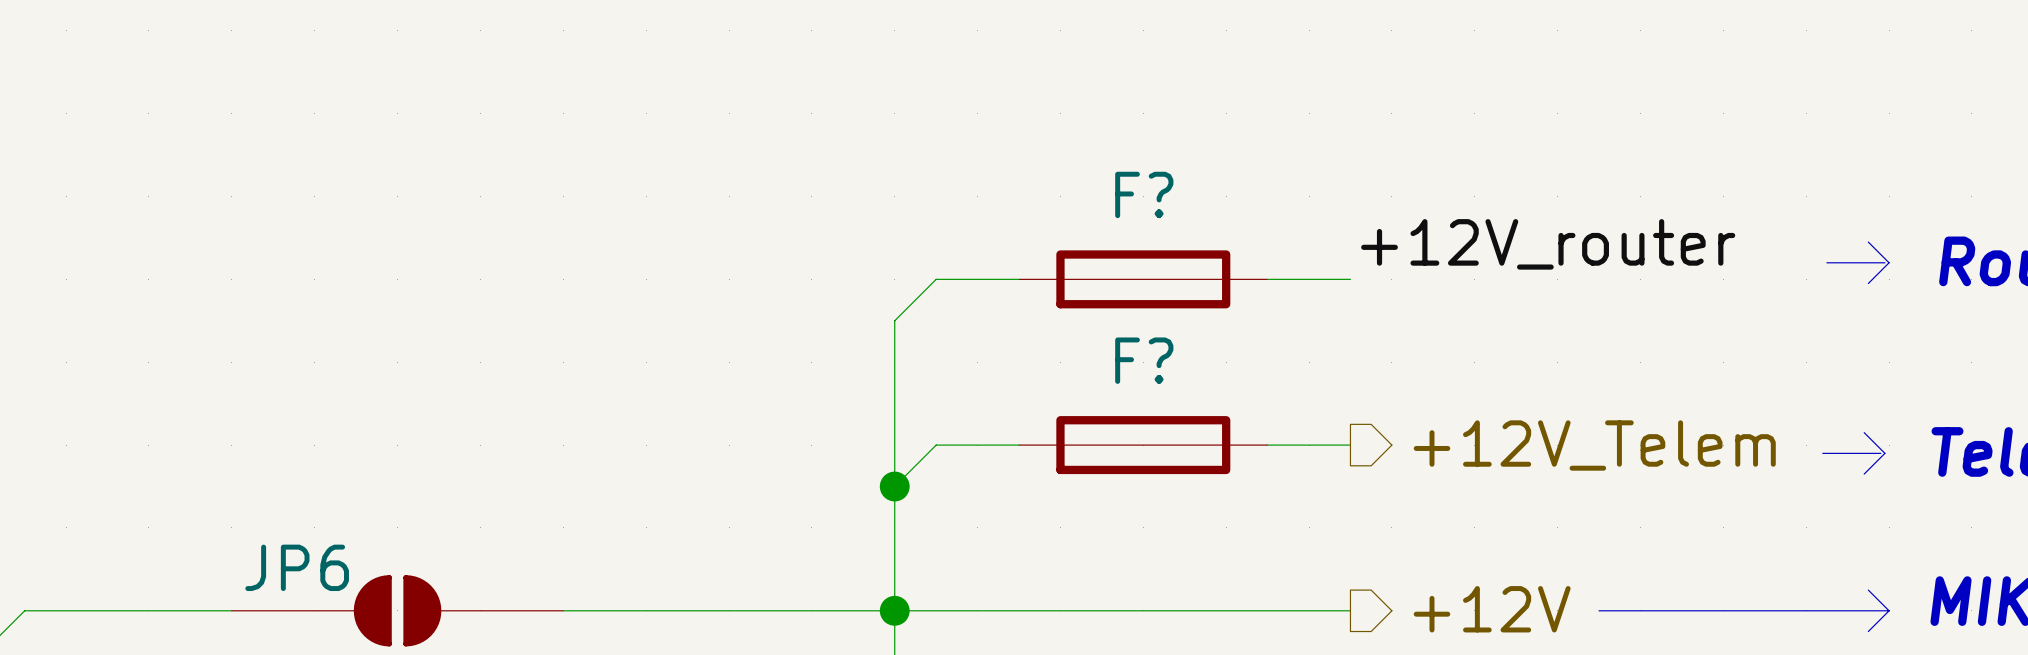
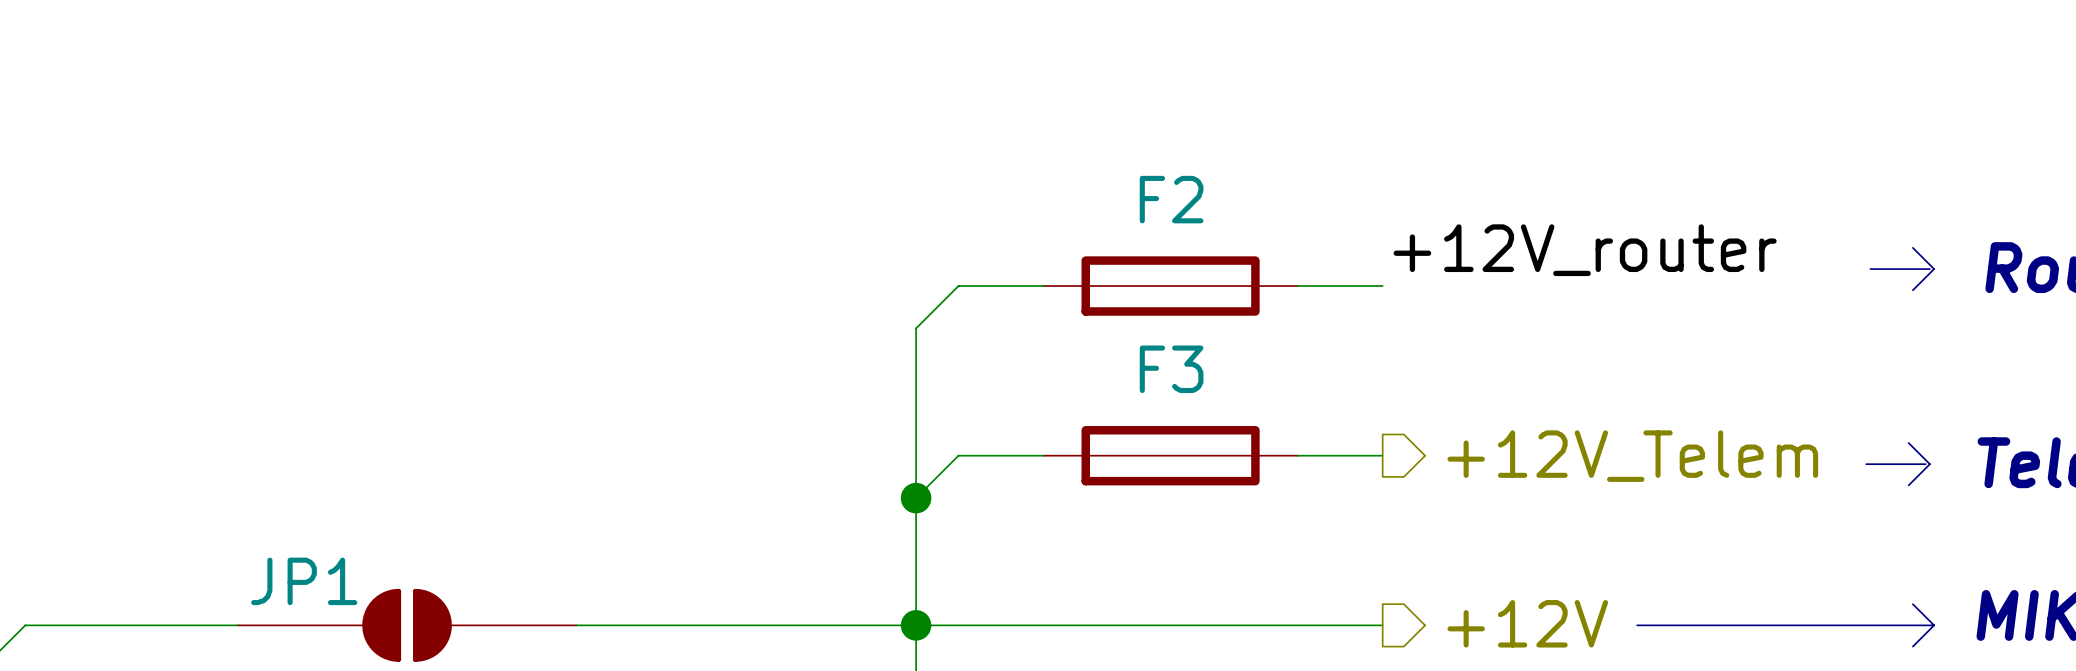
F? name: F? (1144, 194) -> F2 (1171, 199)
F? name: F? (1144, 360) -> F3 (1171, 369)
JP6 name: JP6 (297, 567) -> JP1 (304, 581)

